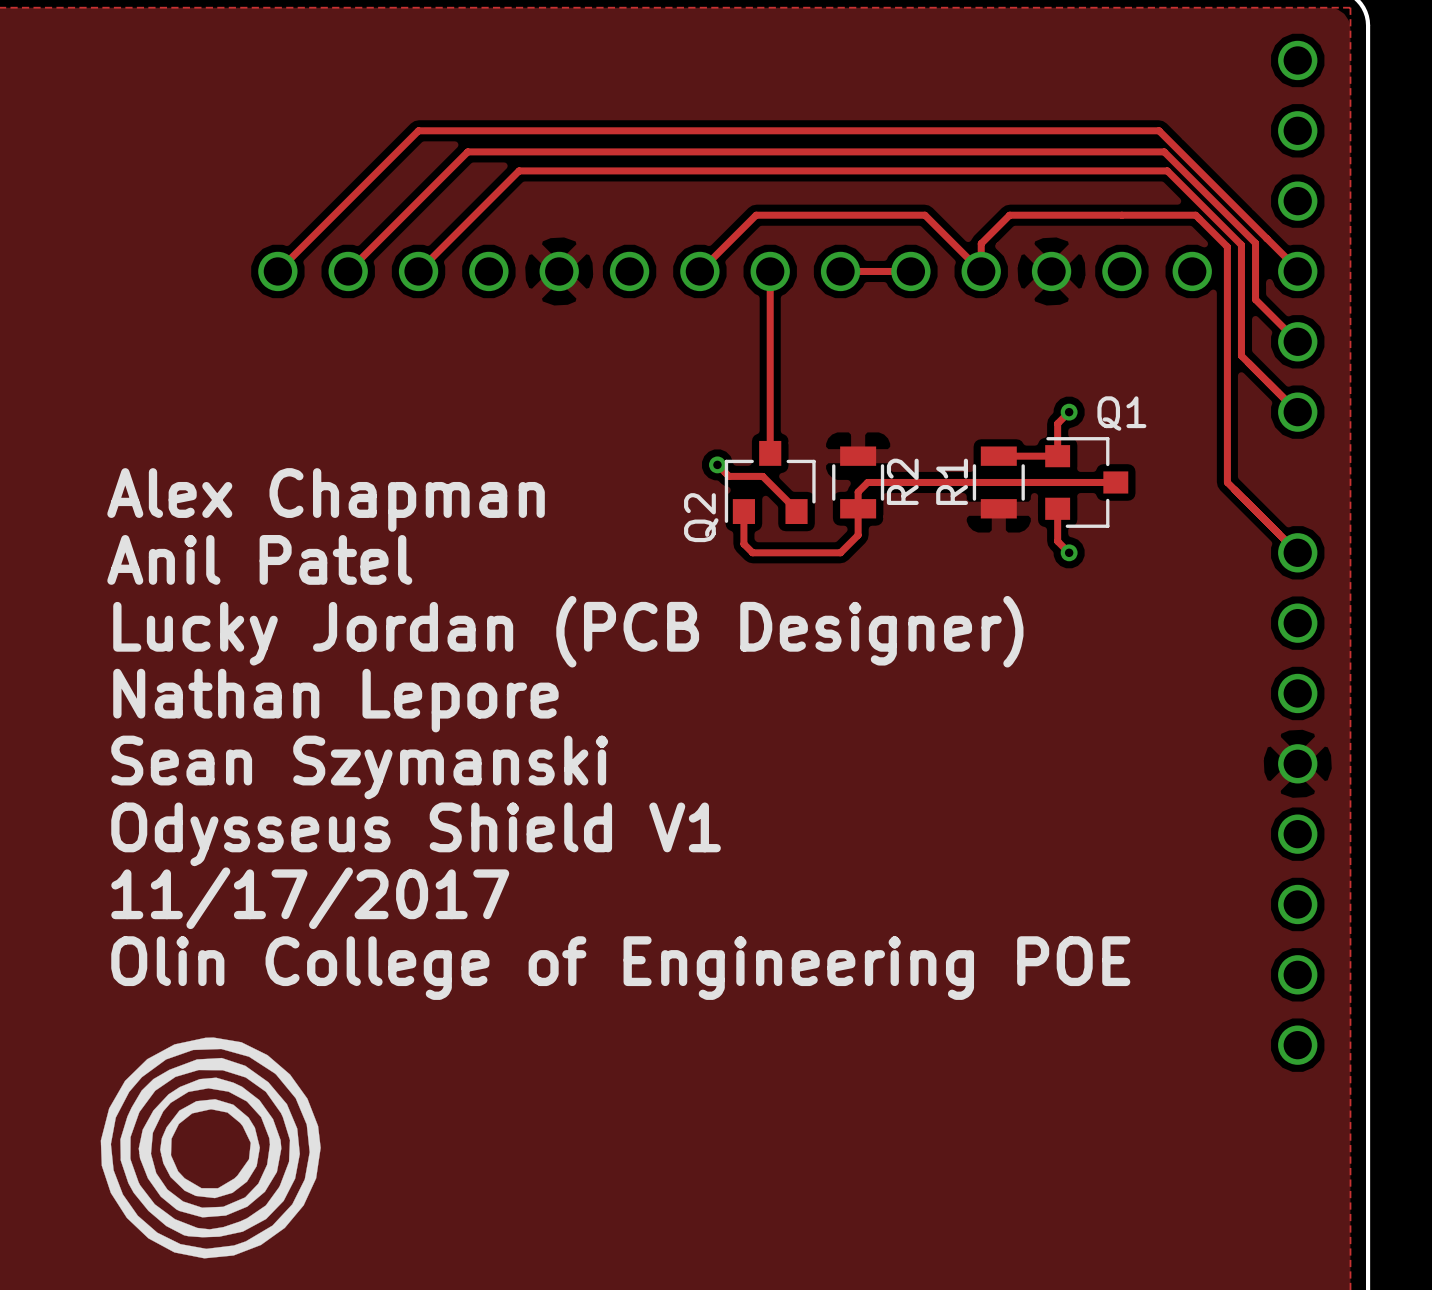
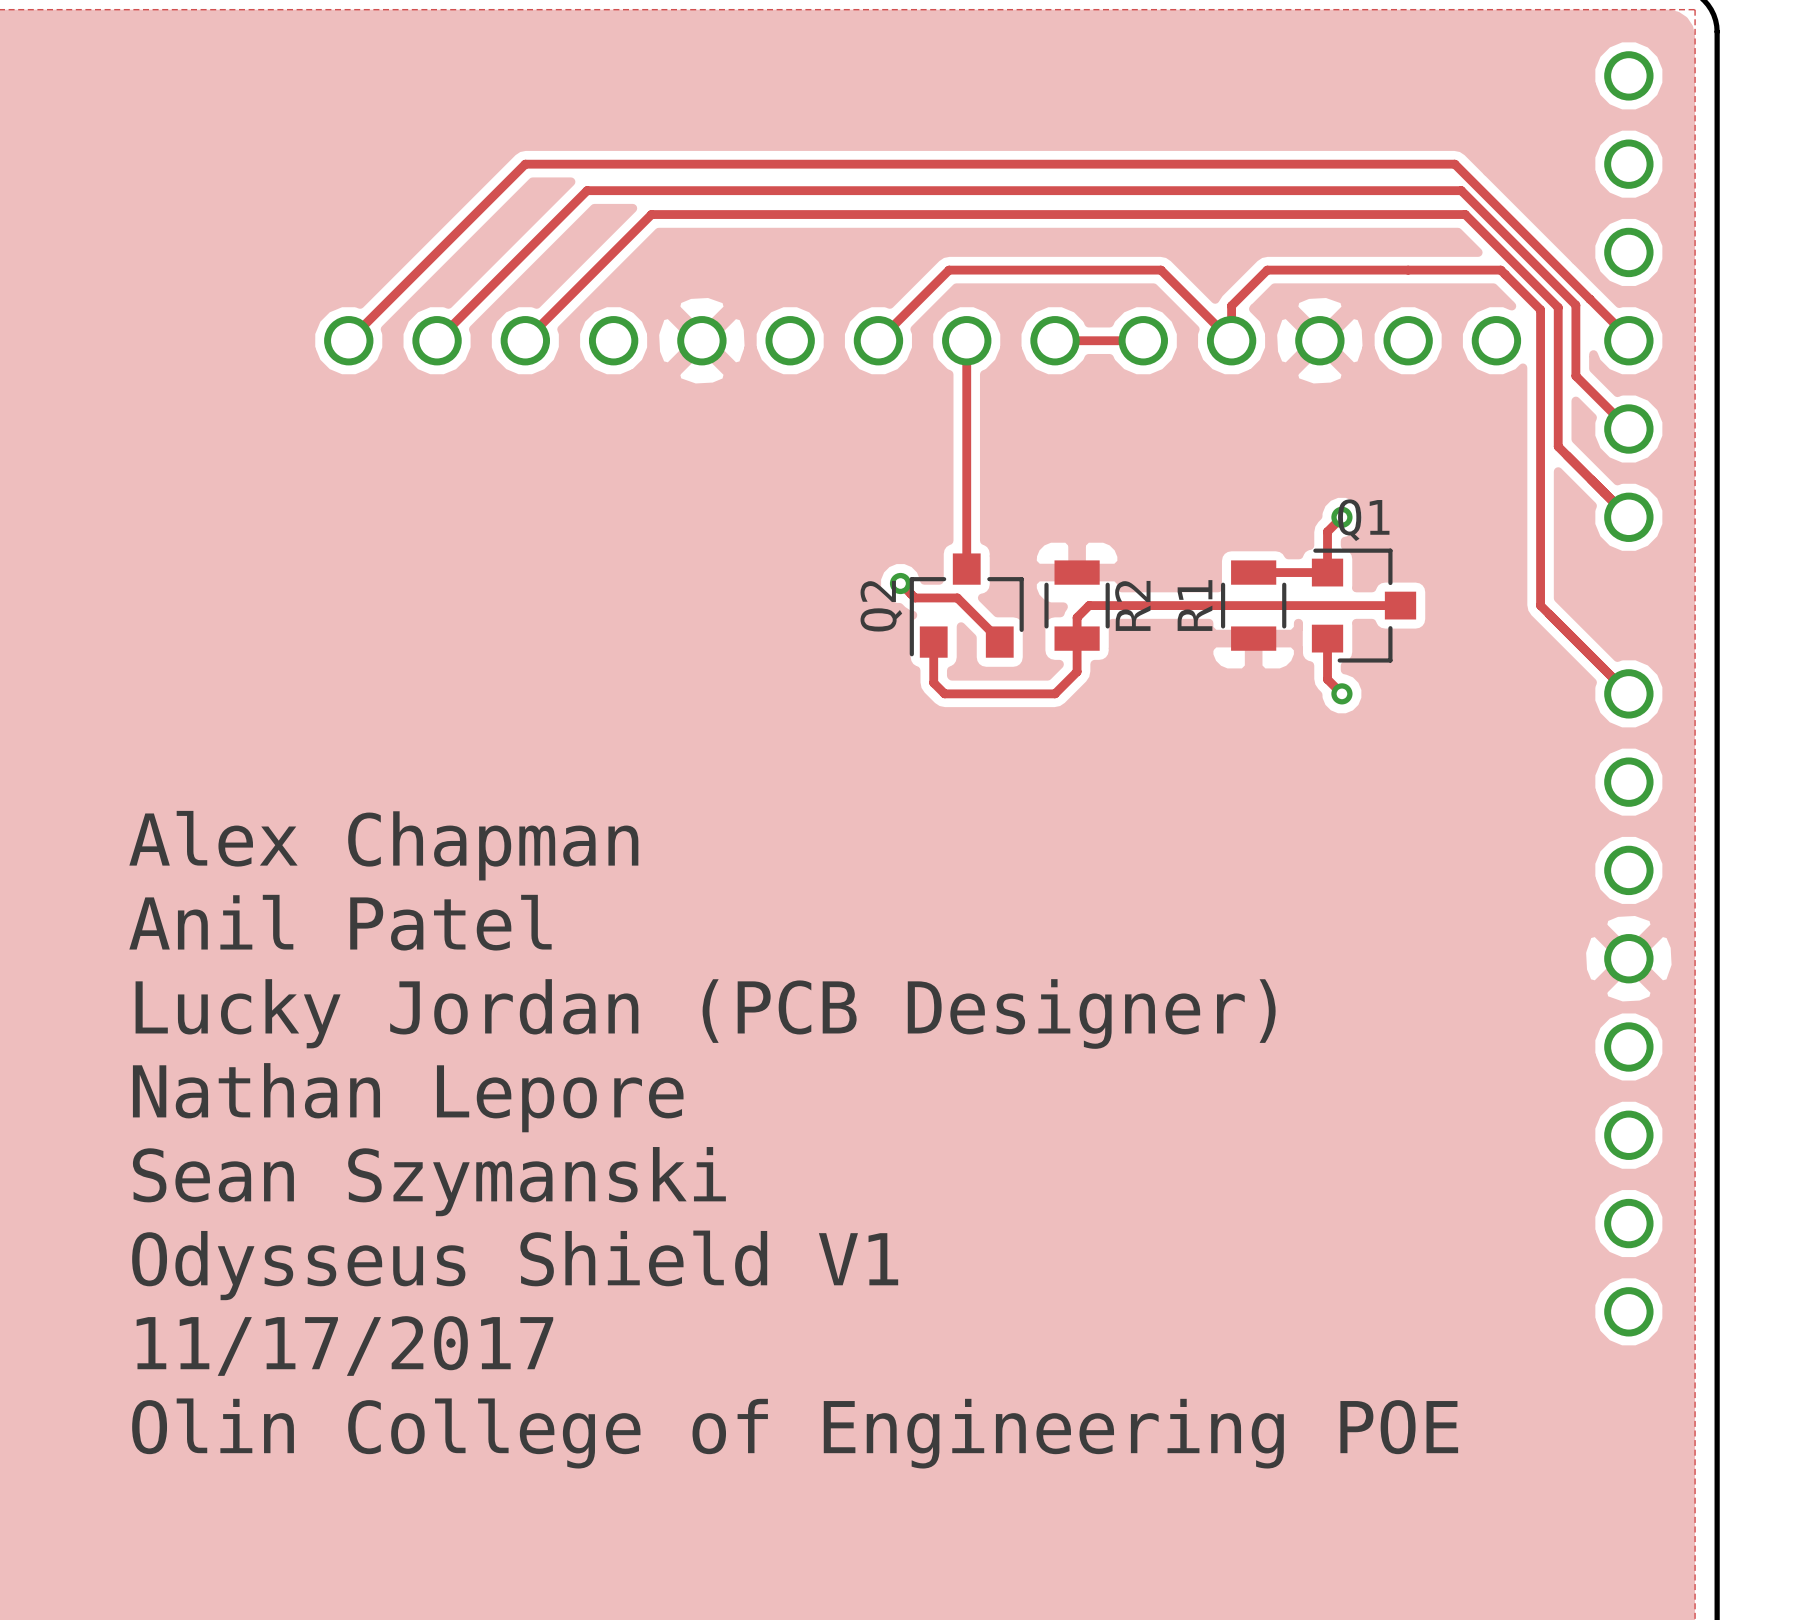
Q1 name position: Q1 (1121, 413) -> Q1 (1363, 520)
text position: Alex Chapman (326, 499) -> Alex Chapman (383, 845)
Q2 name position: Q2 (701, 517) -> Q2 (881, 606)
text position: Anil Patel (259, 559) -> Anil Patel (340, 922)
text position: Lucky Jordan (PCB Designer) (568, 631) -> Lucky Jordan (PCB Designer) (705, 1013)
text position: Nathan Lepore (335, 700) -> Nathan Lepore (408, 1097)
text position: Sean Szymanski (359, 767) -> Sean Szymanski (429, 1181)
text position: Odysseus Shield V1 (416, 834) -> Odysseus Shield V1 (515, 1265)
text position: 11/17/2017 (310, 898) -> 11/17/2017 (344, 1346)
text position: Olin College of Engineering POE (620, 968) -> Olin College of Engineering POE (795, 1433)
drawing: [100, 1037, 321, 1259] -> none

